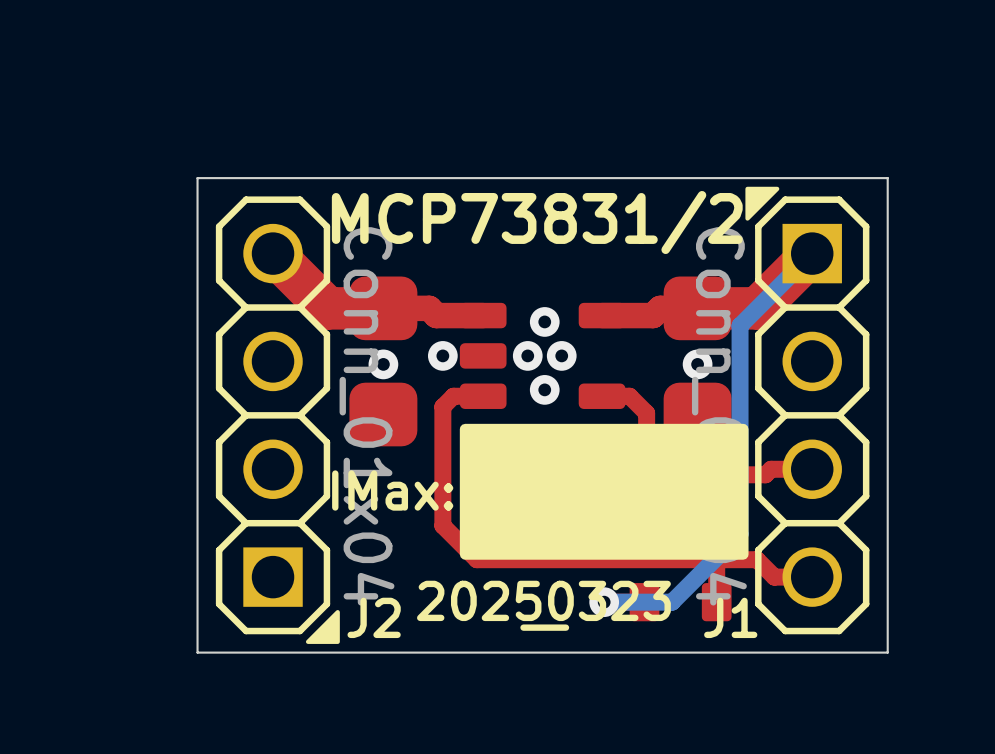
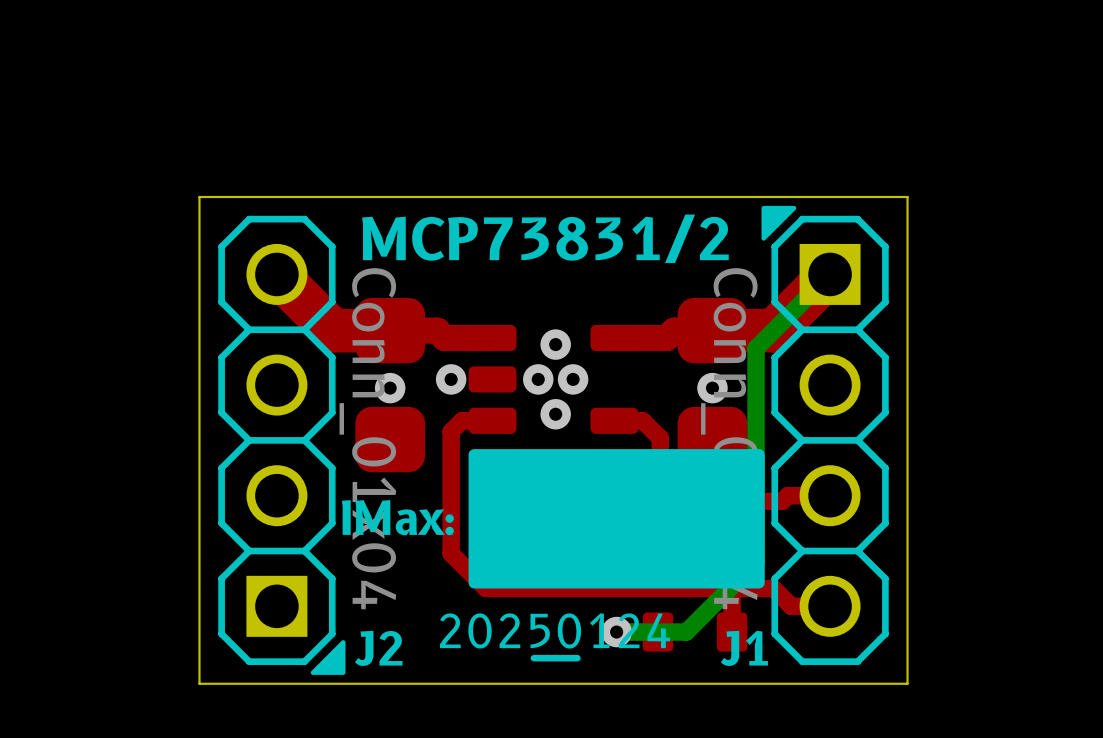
drawing shape: [417, 580, 671, 631] -> [439, 613, 671, 662]

